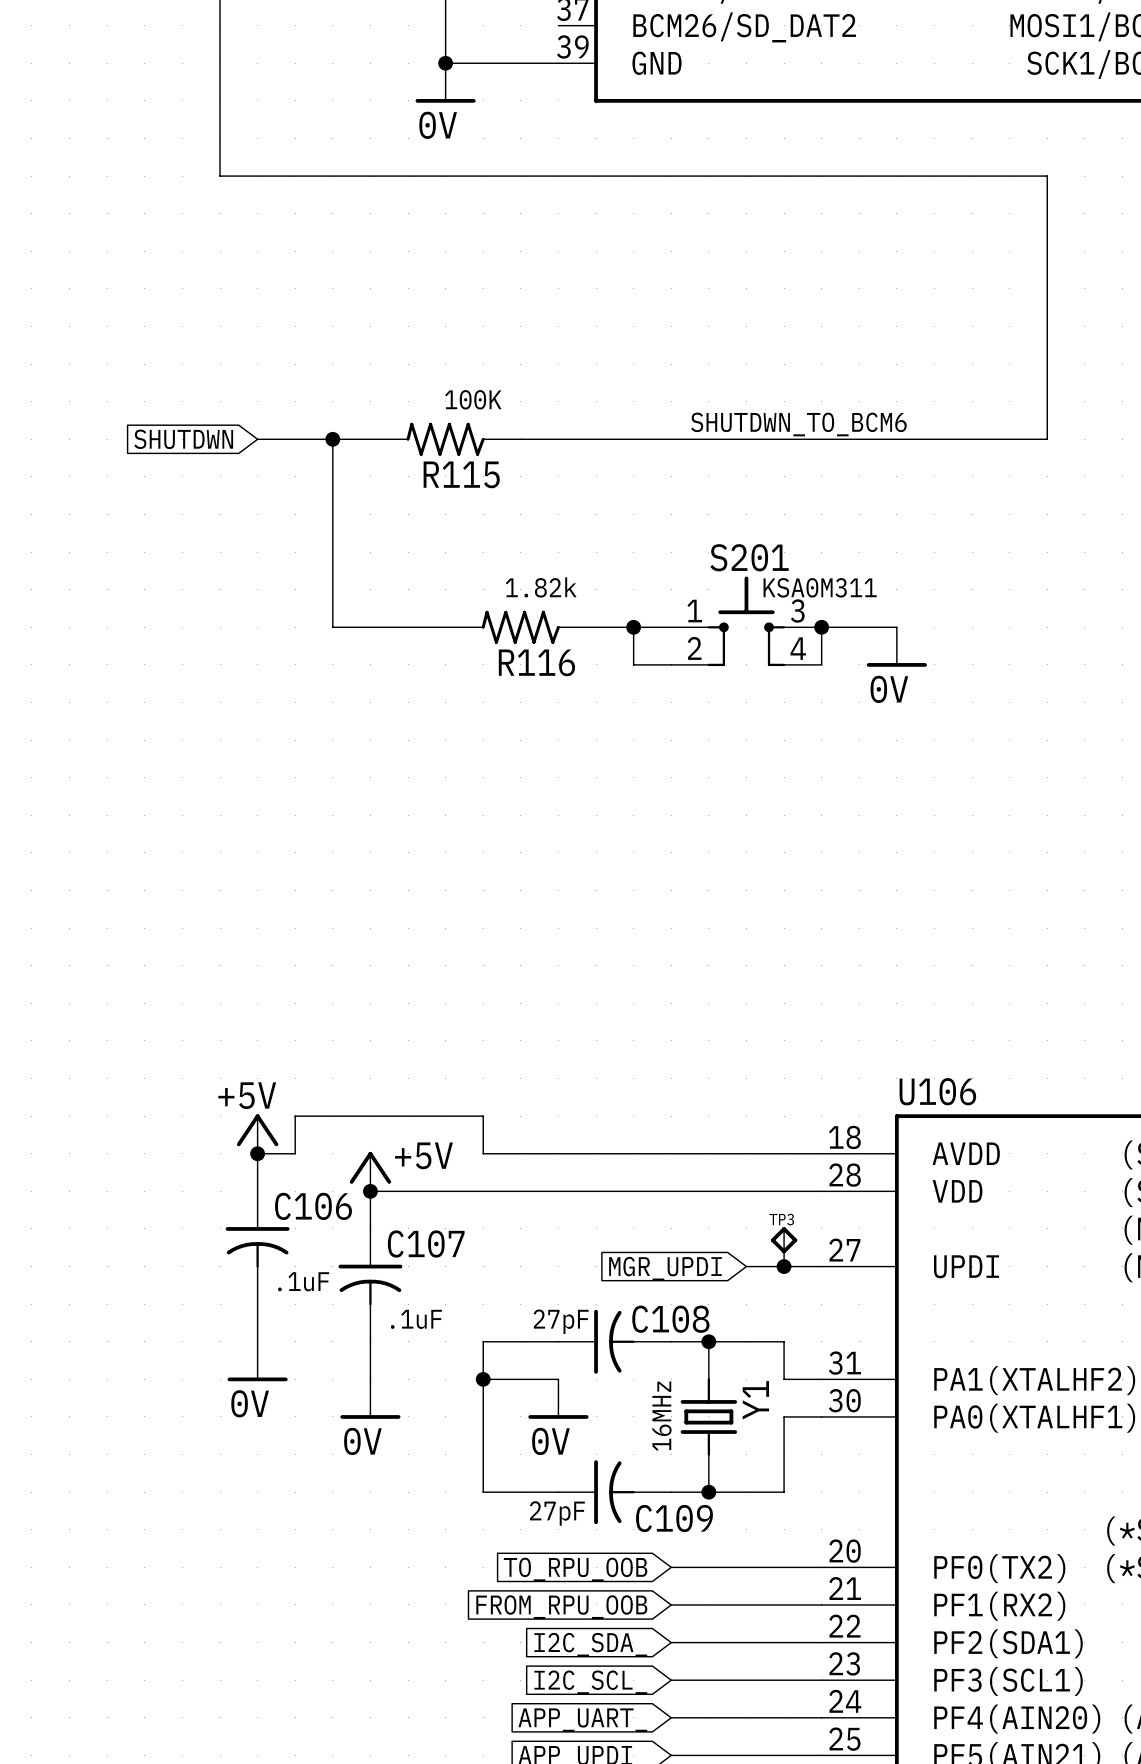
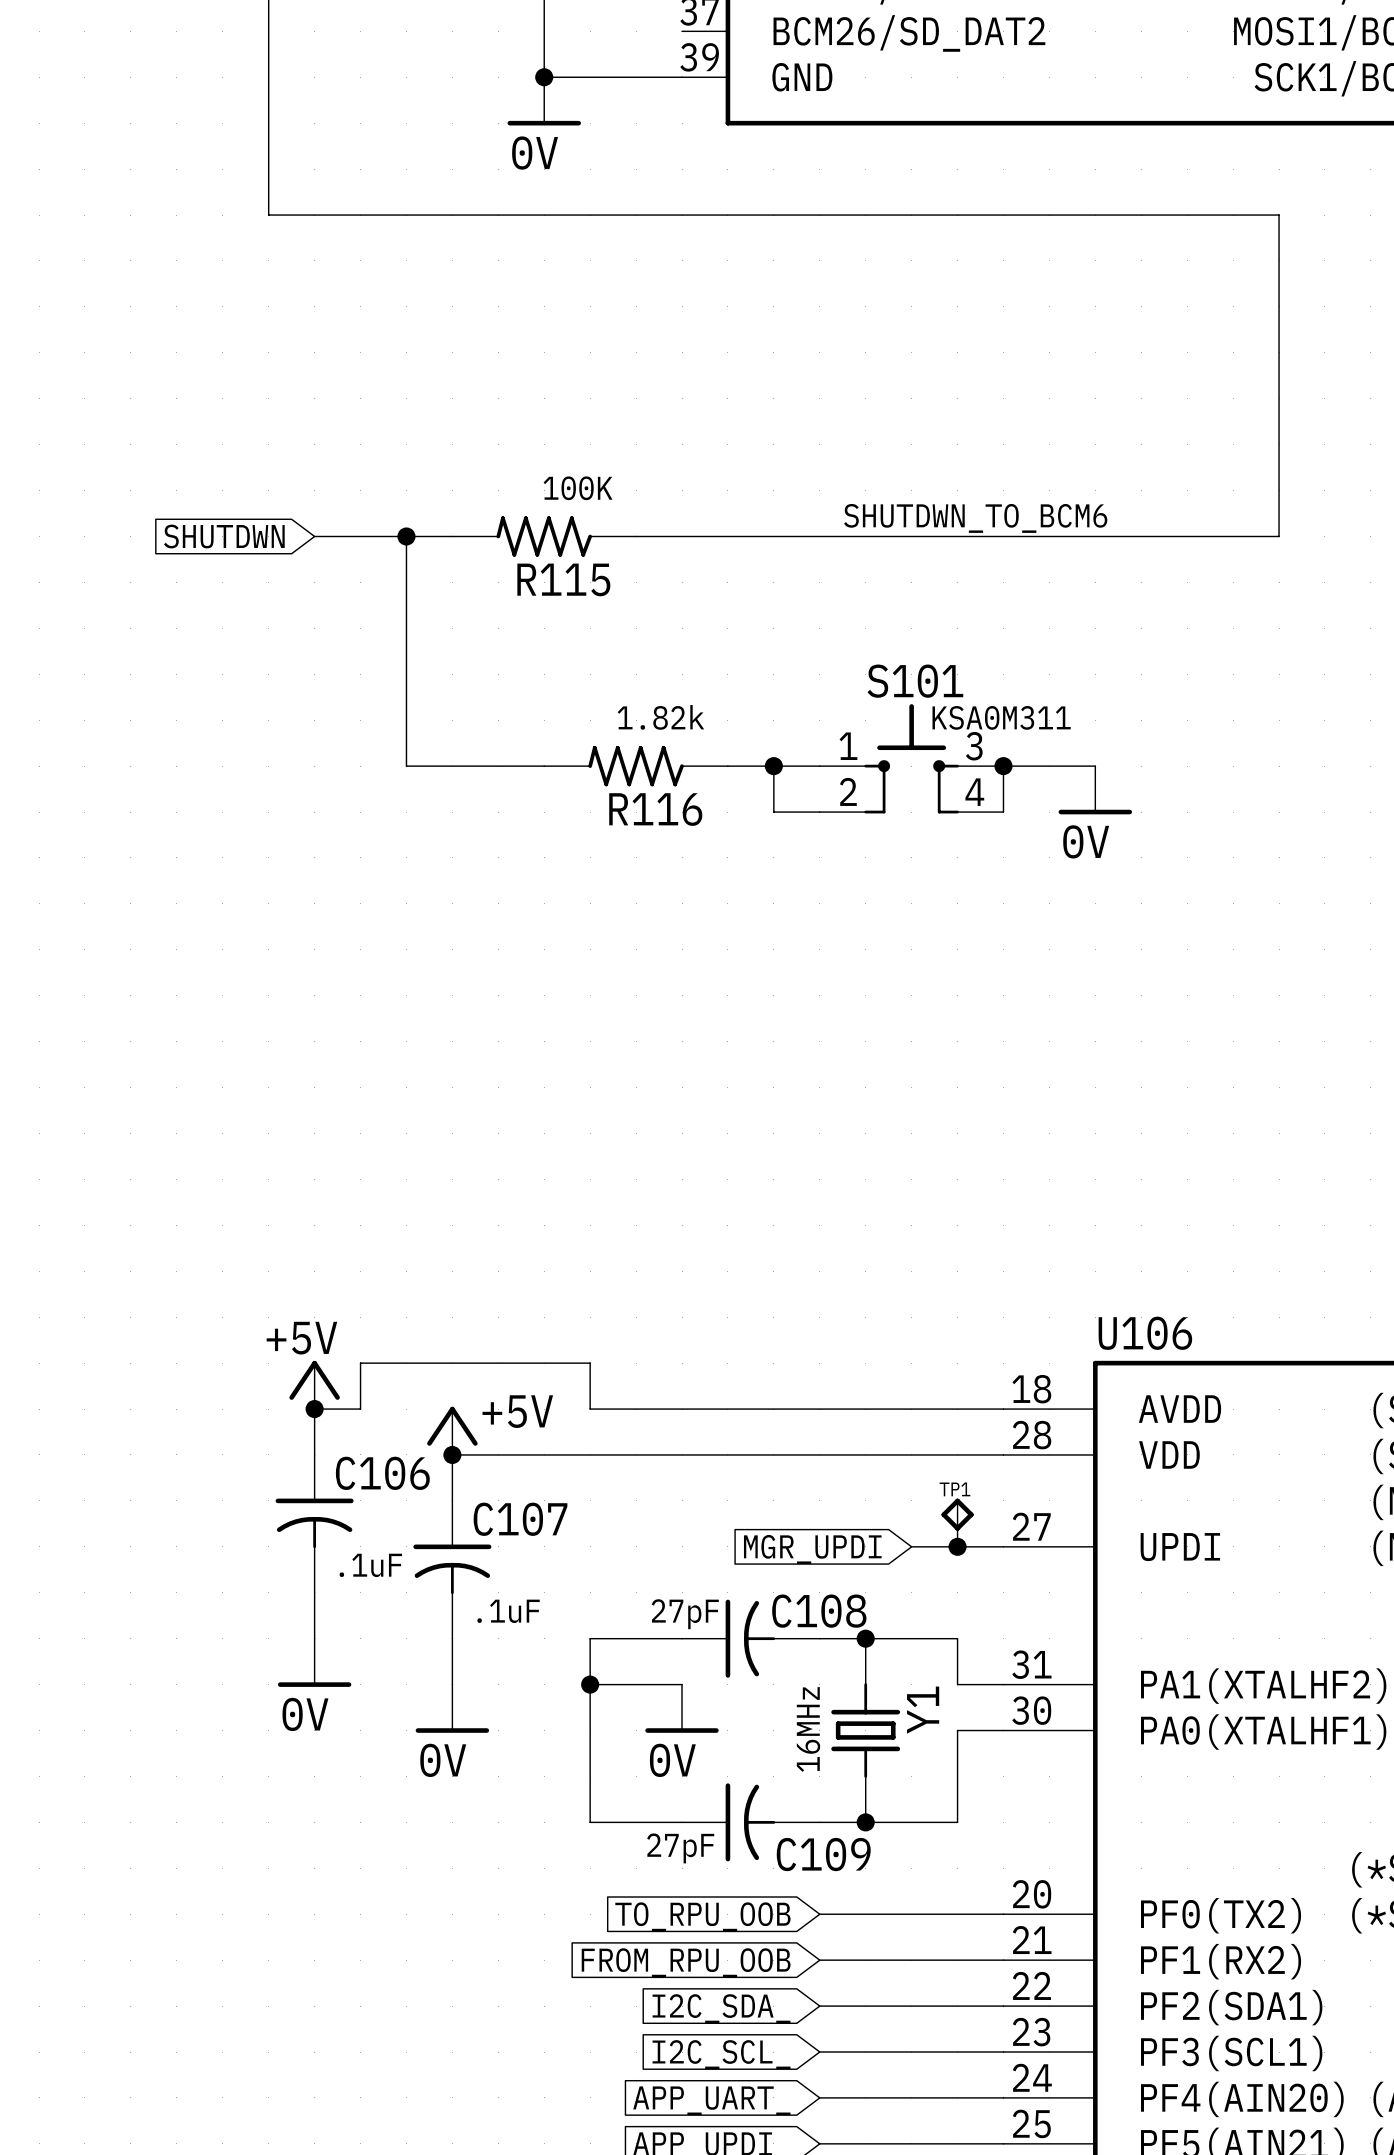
S201 name: S201 (749, 557) -> S101 (915, 681)
TP3 name: TP3 (781, 1219) -> TP1 (954, 1489)

